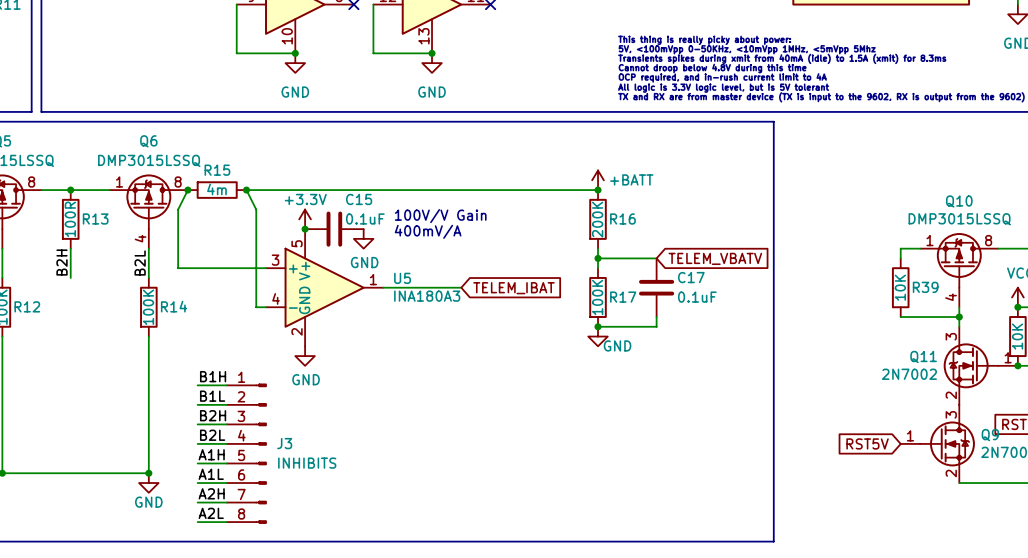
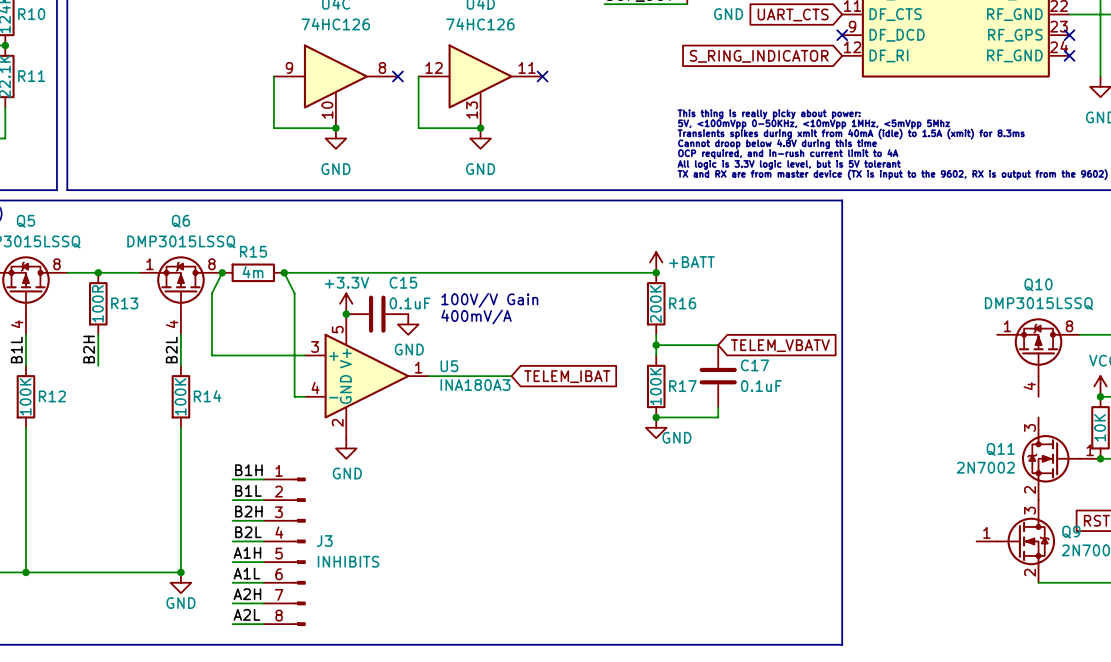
wire: (920, 248) (900, 248) (900, 258) -> none
R39: 10K (900, 287) -> none
wire: (959, 307) (959, 326) -> none
wire: (900, 317) (959, 317) -> none
junction: (959, 317) -> none
global label: RST5V (867, 443) -> none

